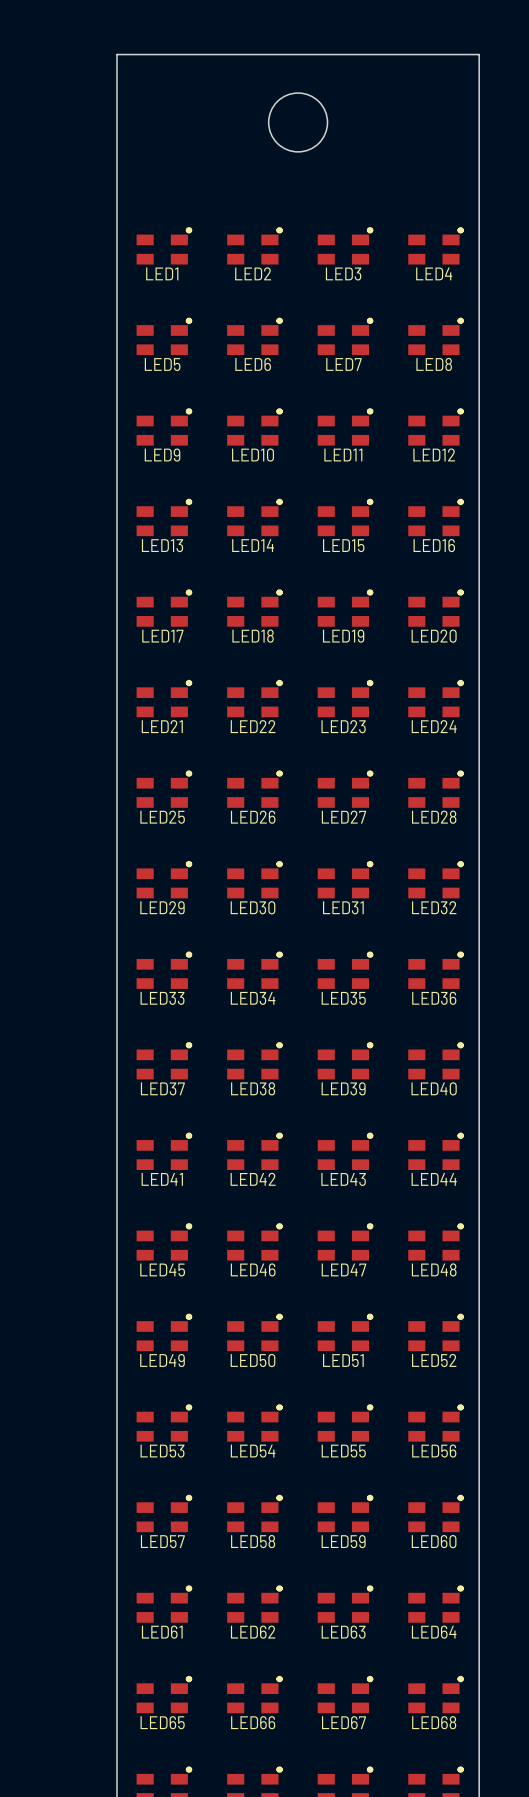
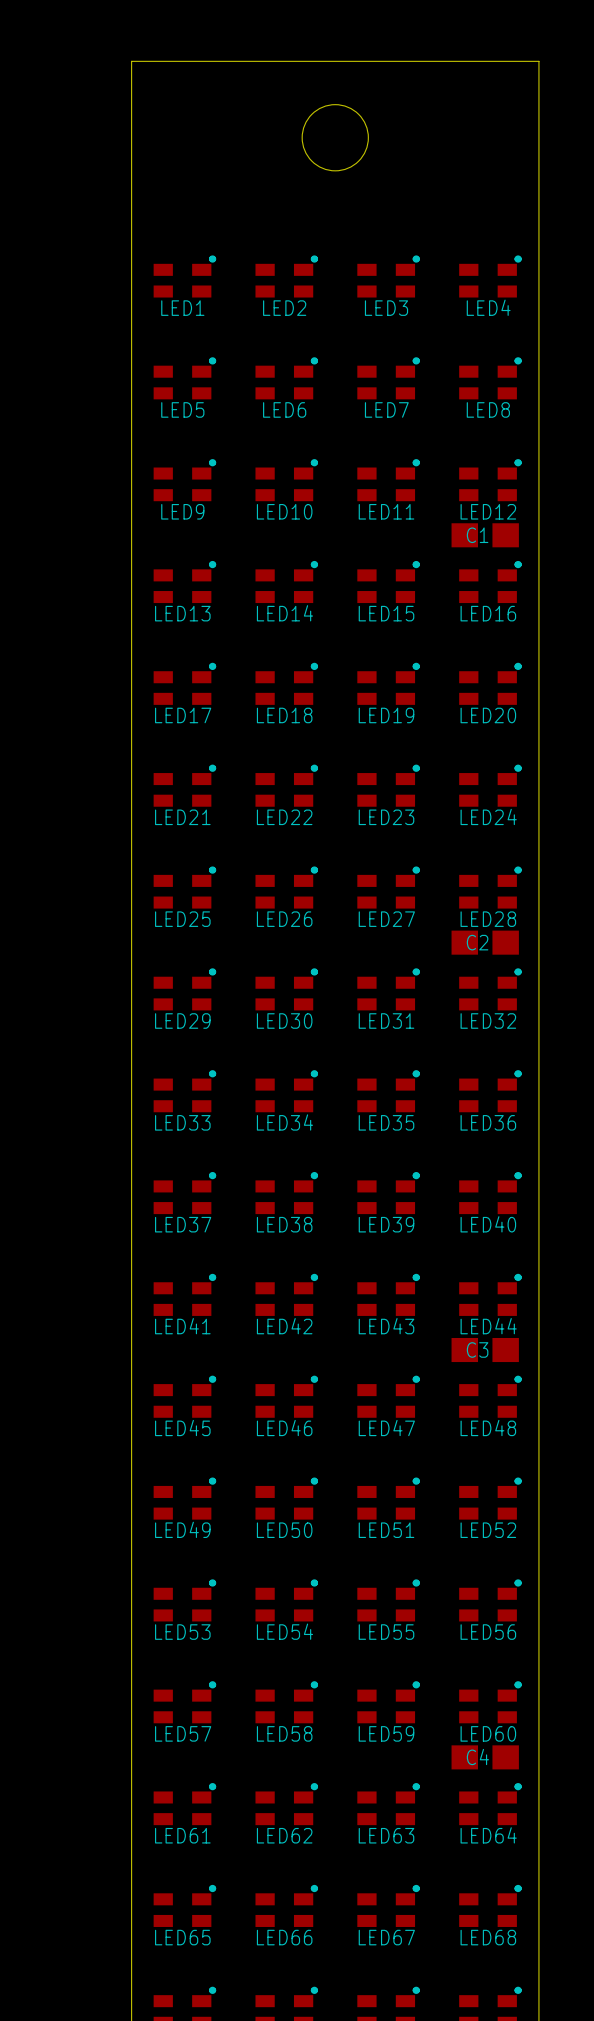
C1: none -> (485, 535)
C2: none -> (485, 942)
C3: none -> (485, 1350)
C4: none -> (485, 1757)

